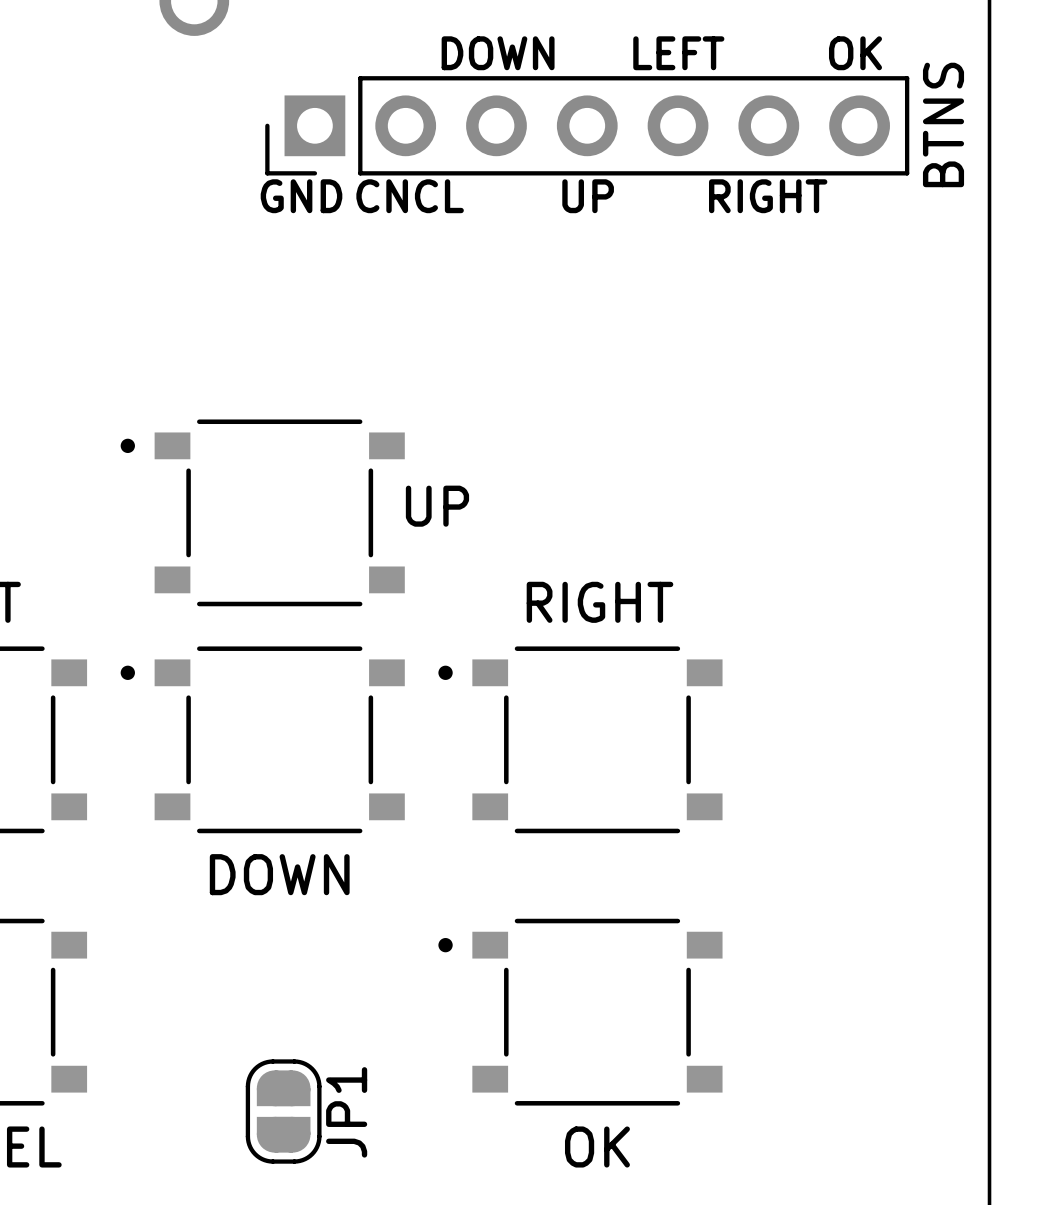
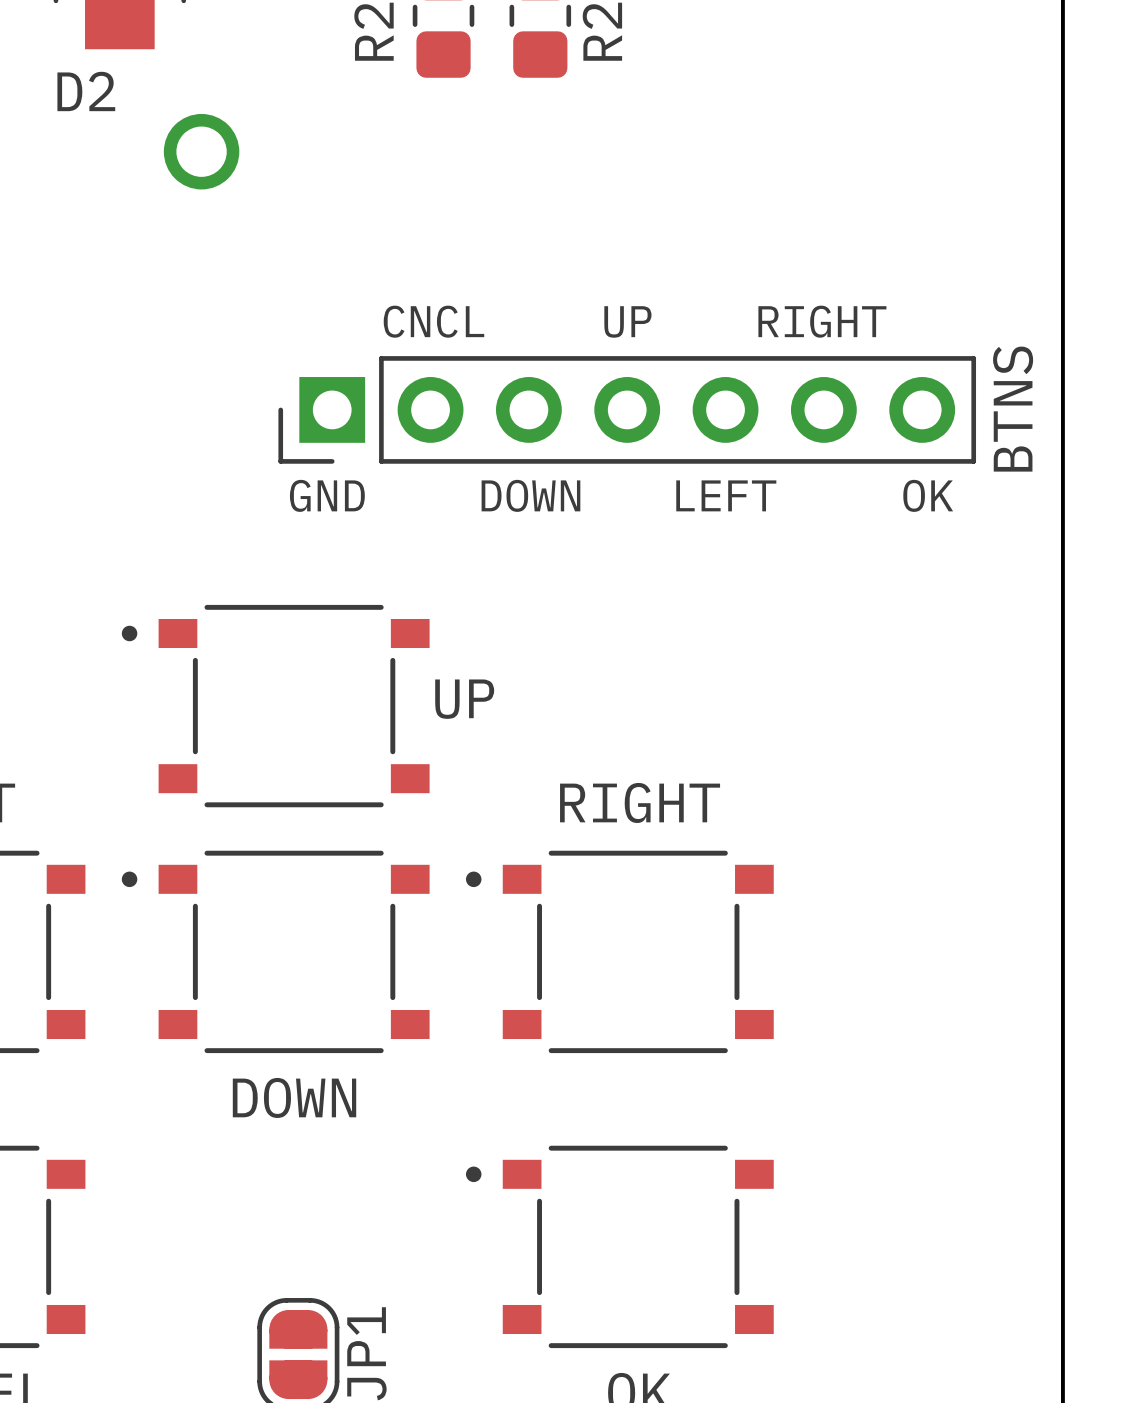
text position: DOWN (498, 53) -> DOWN (530, 495)
text position: LEFT (678, 53) -> LEFT (726, 495)
text position: OK (855, 53) -> OK (928, 495)
part position: (587, 125) -> (627, 409)
text position: GND (301, 196) -> GND (327, 495)
text position: CNCL (410, 196) -> CNCL (433, 321)
text position: UP (588, 196) -> UP (627, 321)
text position: RIGHT (768, 196) -> RIGHT (822, 321)

